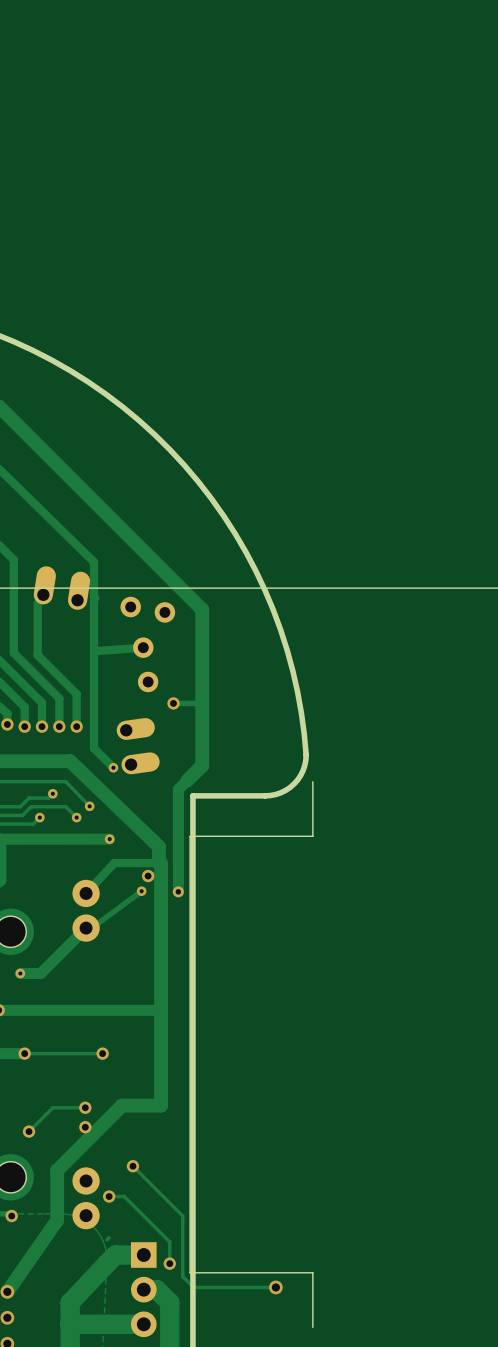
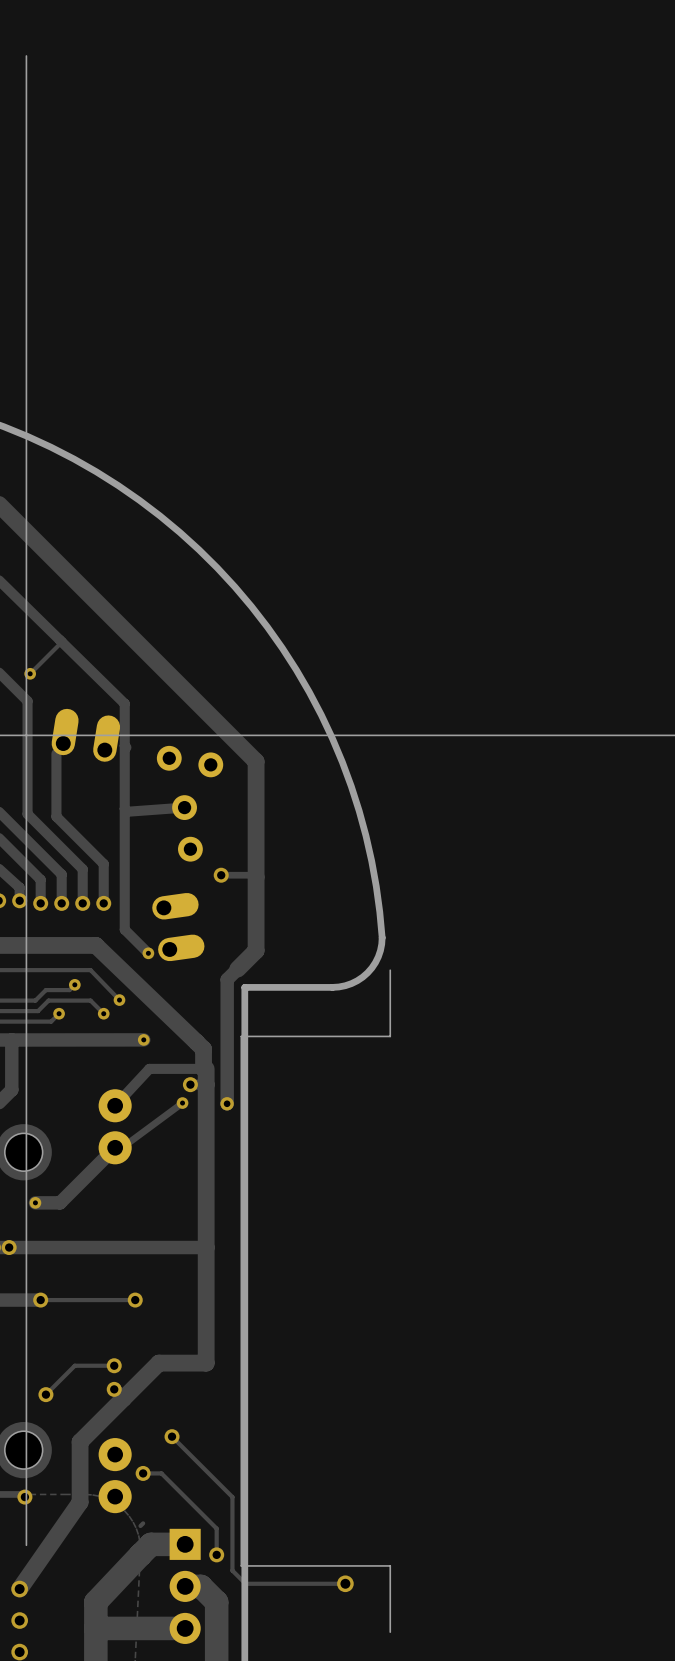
board edge: none -> (26, 55) (26, 1545)
track: none -> (61, 642) (30, 673)
via: none -> (30, 673)

